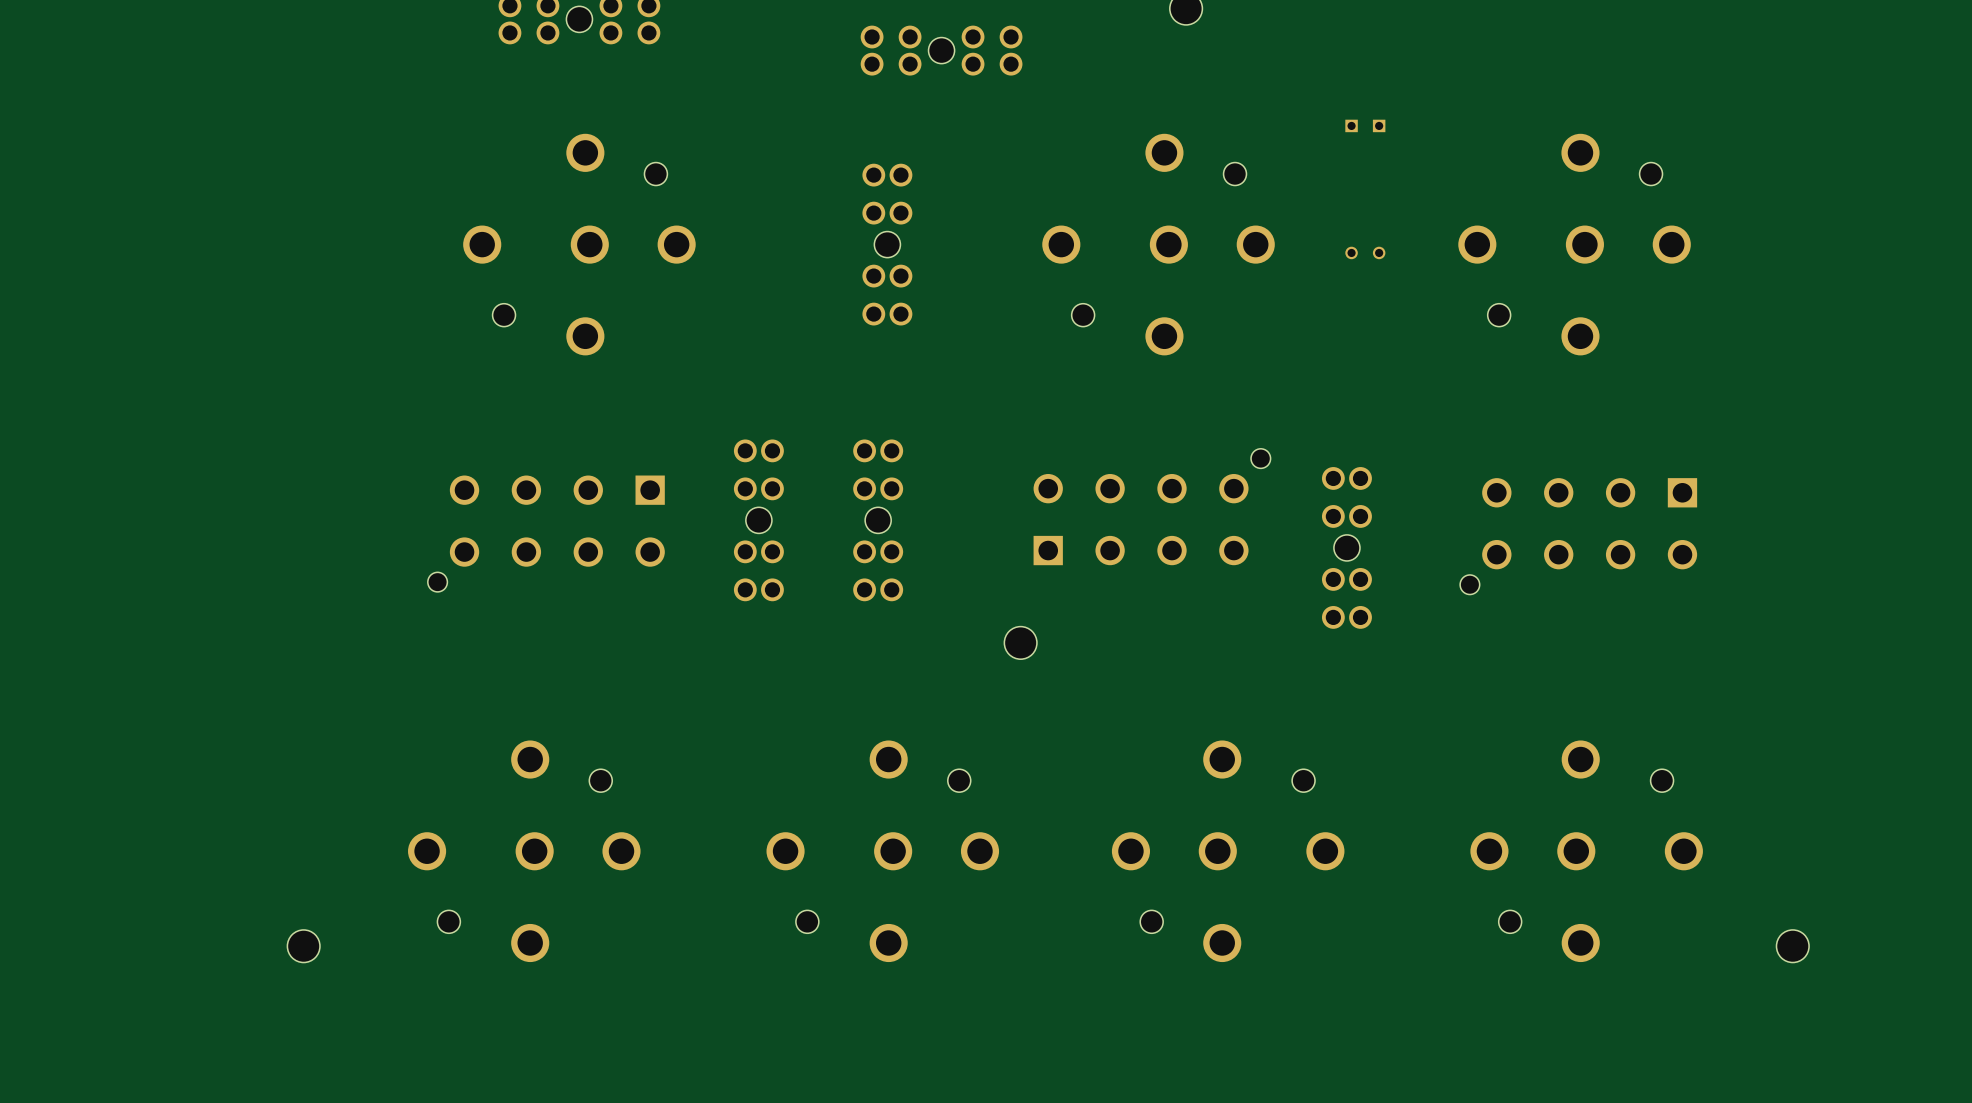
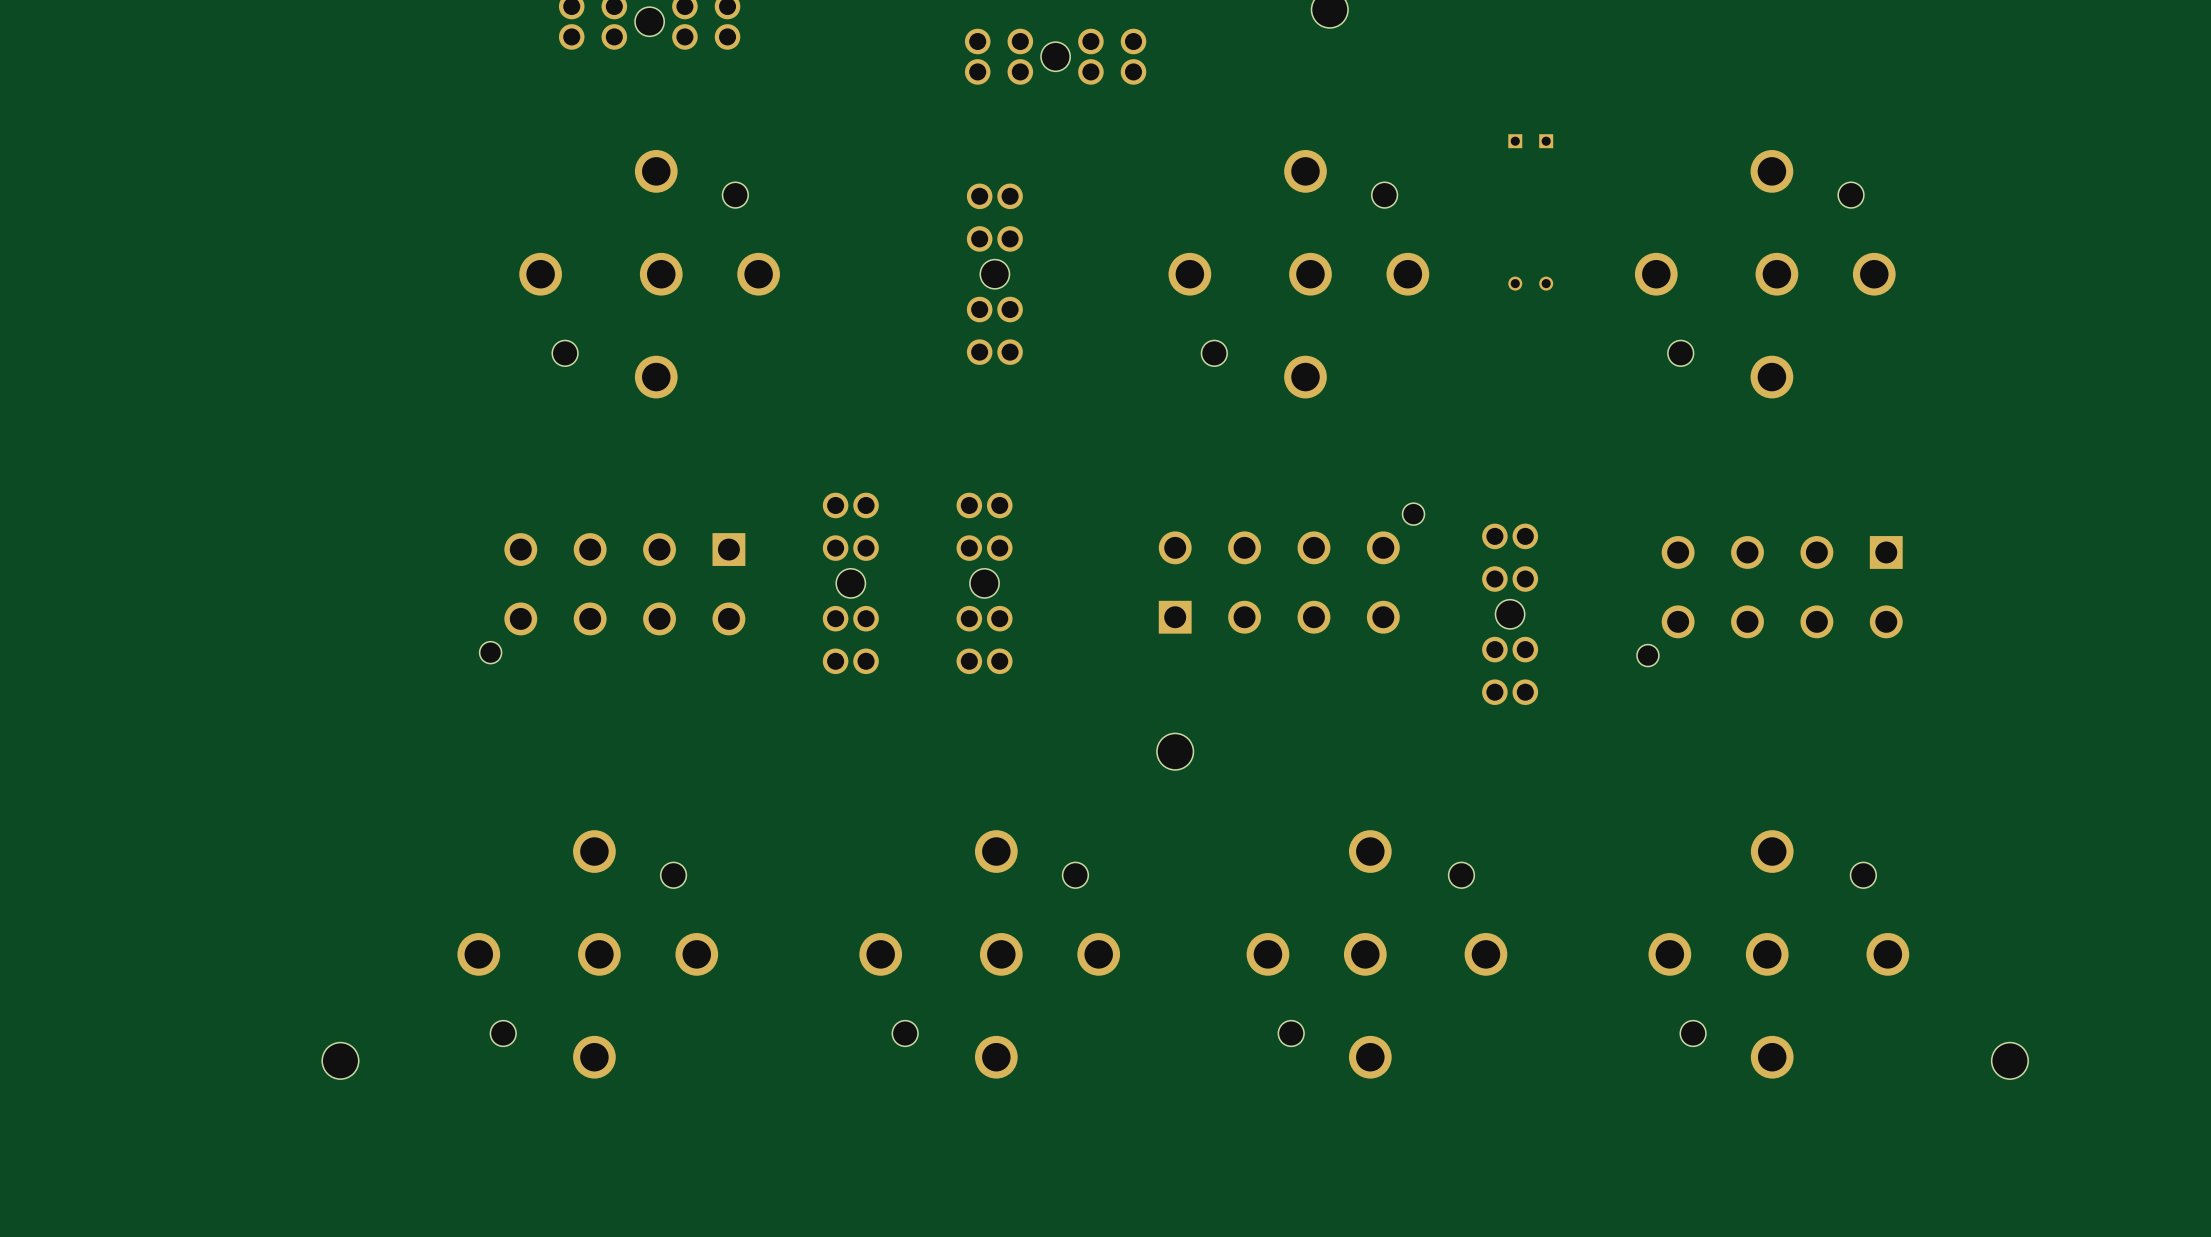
part position: (1020, 642) -> (1175, 751)

